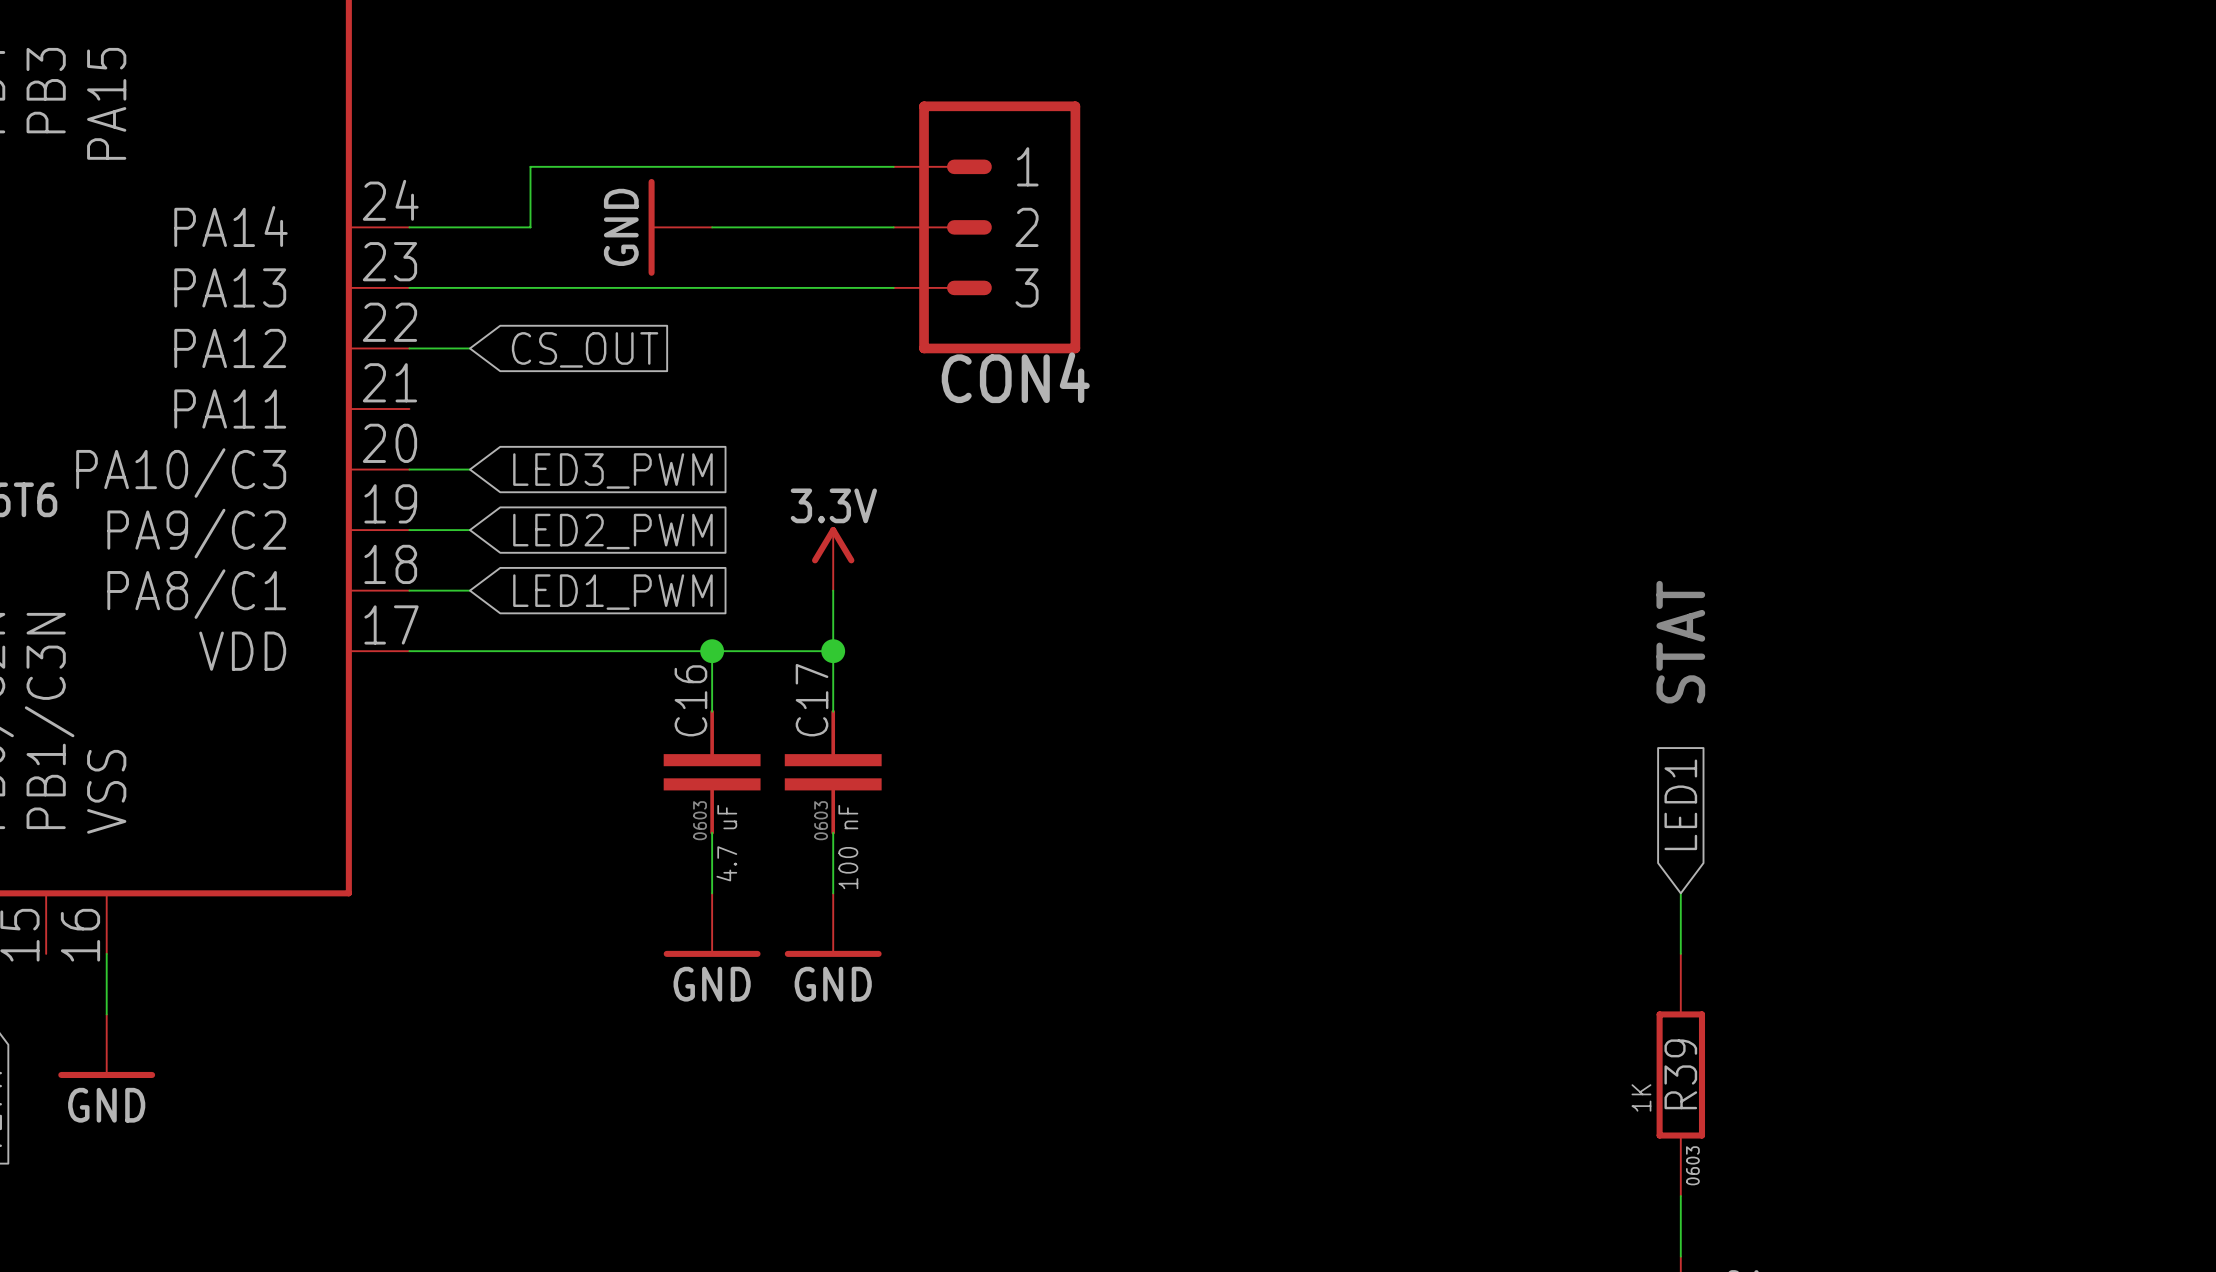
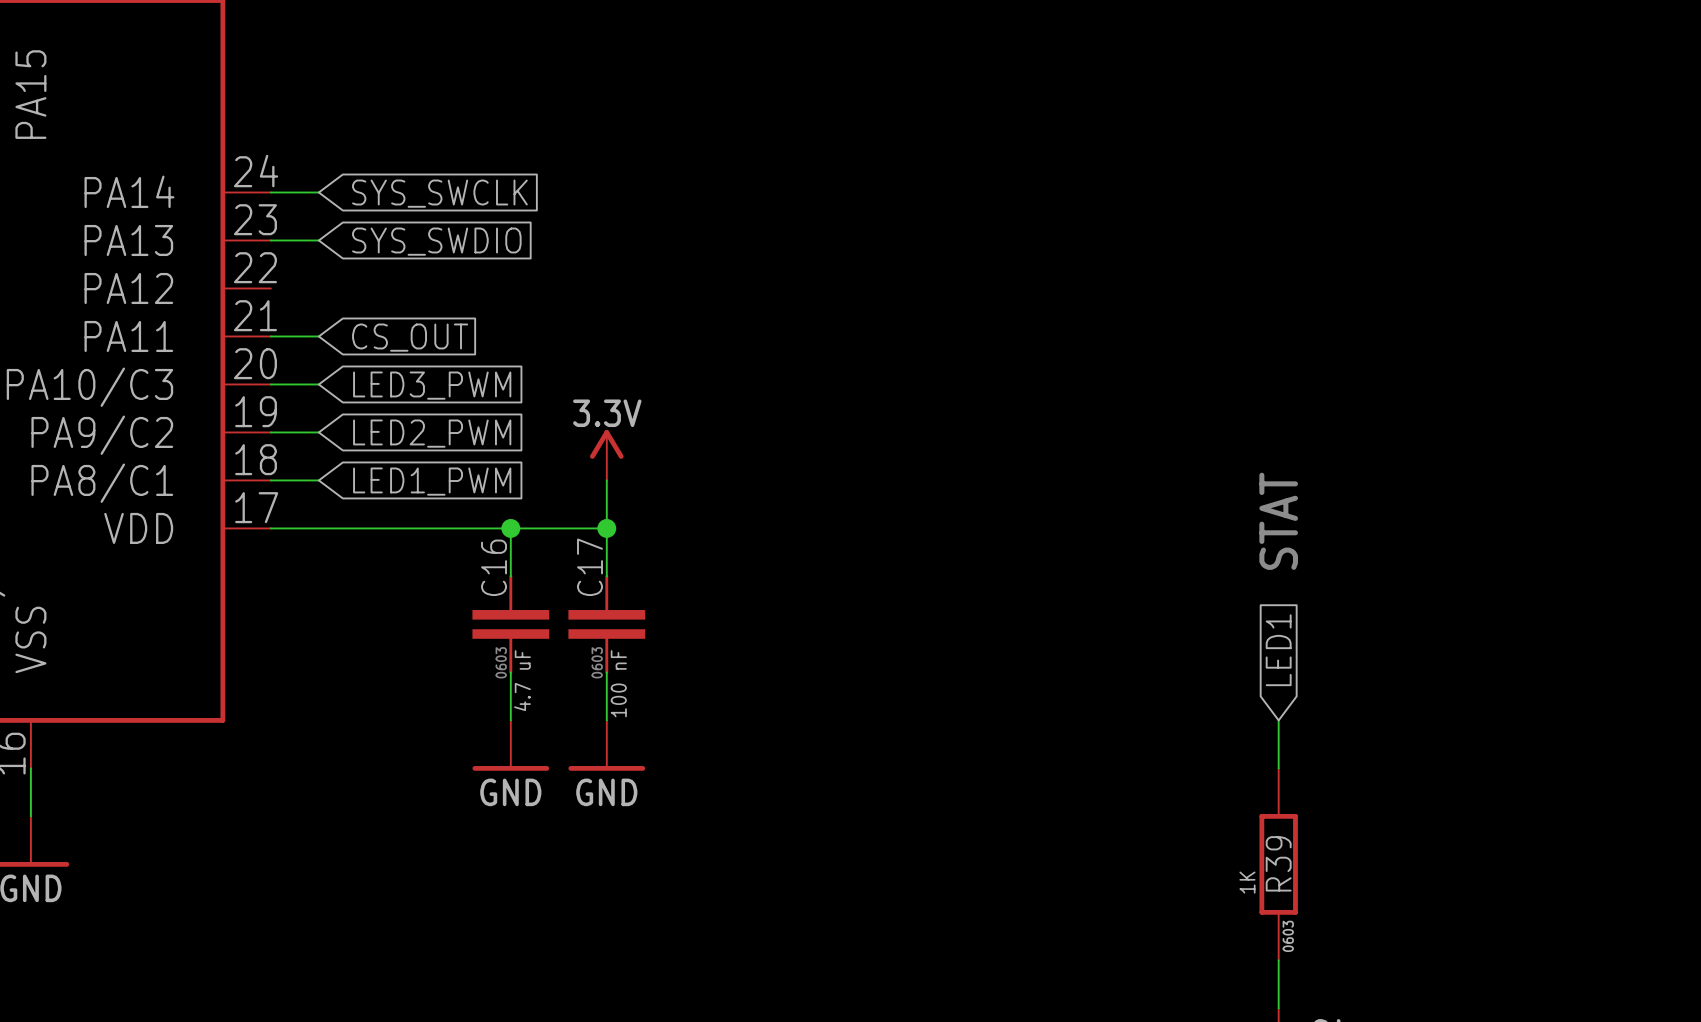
wire: (893, 166) (530, 166) (530, 227) (469, 227) -> none
power symbol: GND (680, 227) -> none
wire: (712, 227) (893, 227) -> none
CON4: (986, 227) -> none
global label: none -> SYS_SWCLK (439, 193)
wire: (469, 287) (893, 287) -> none
global label: none -> SYS_SWDIO (436, 241)
wire: (409, 348) (469, 348) -> (270, 336) (318, 336)
global label position: CS_OUT (585, 349) -> CS_OUT (410, 337)

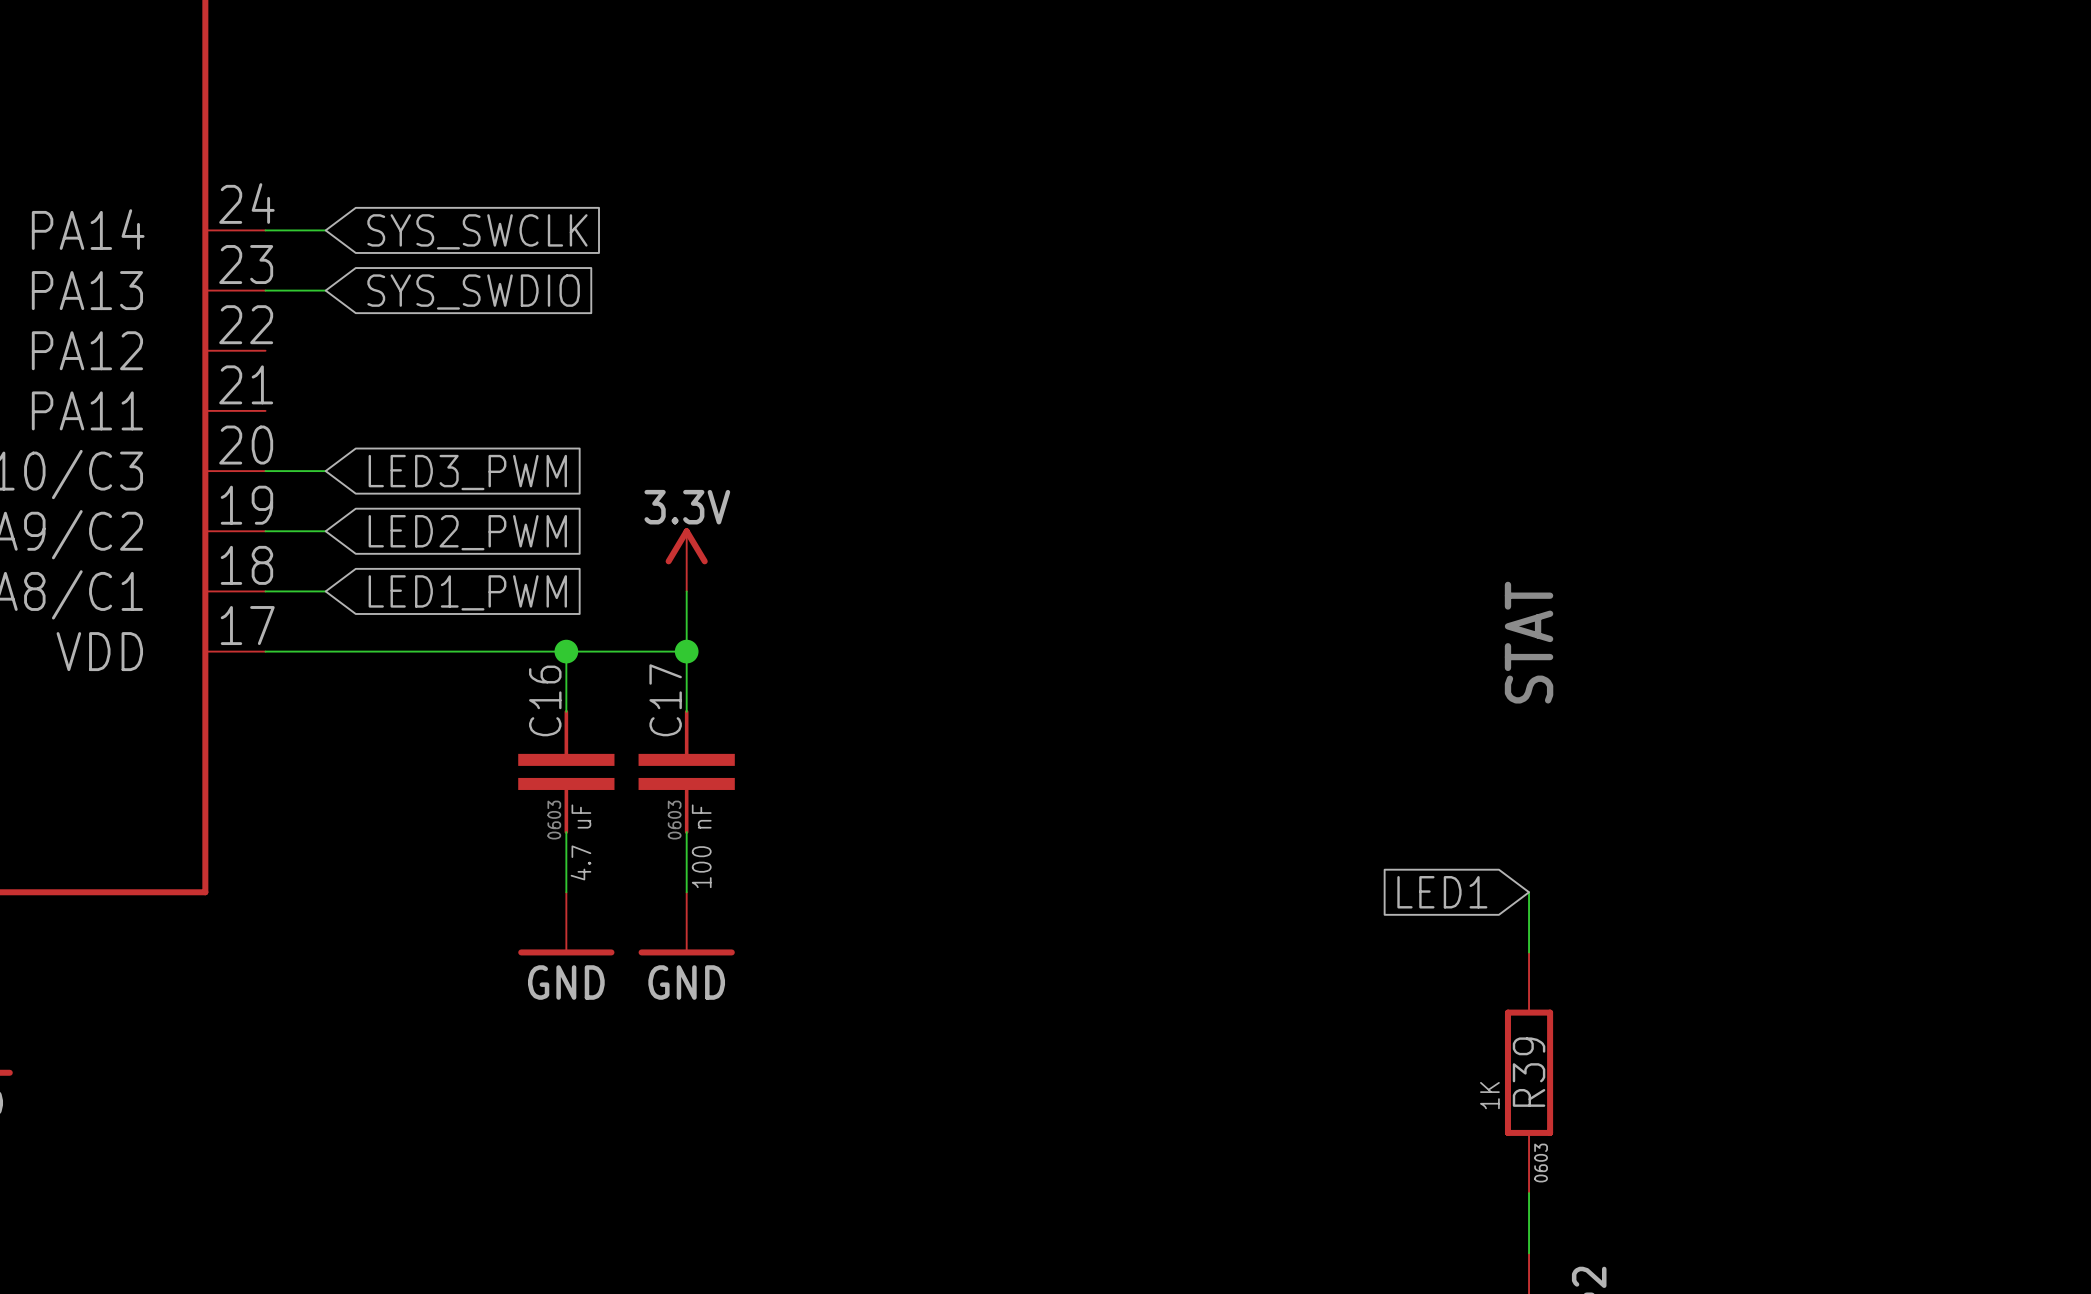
wire: (270, 336) (318, 336) -> none
global label: CS_OUT (410, 337) -> none
global label rotation: 0° (1278, 650) -> 90° counterclockwise (1442, 892)

